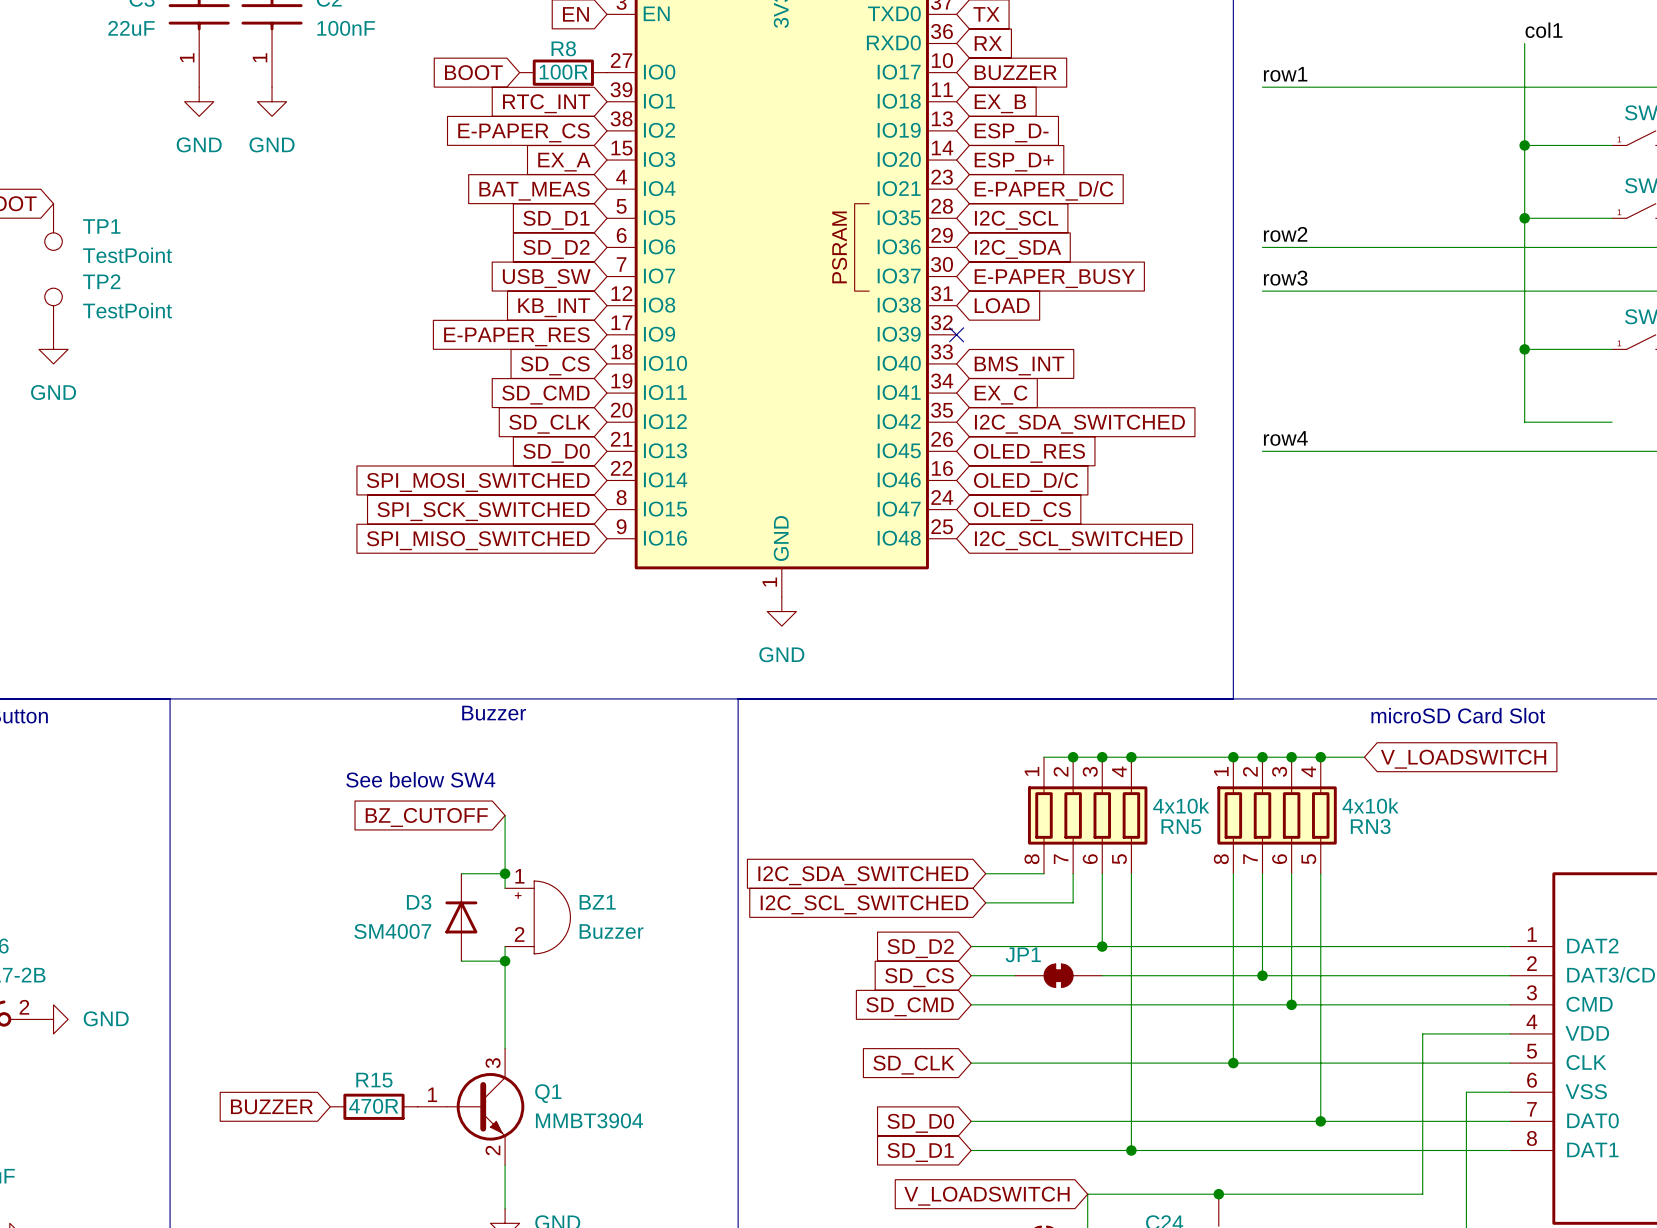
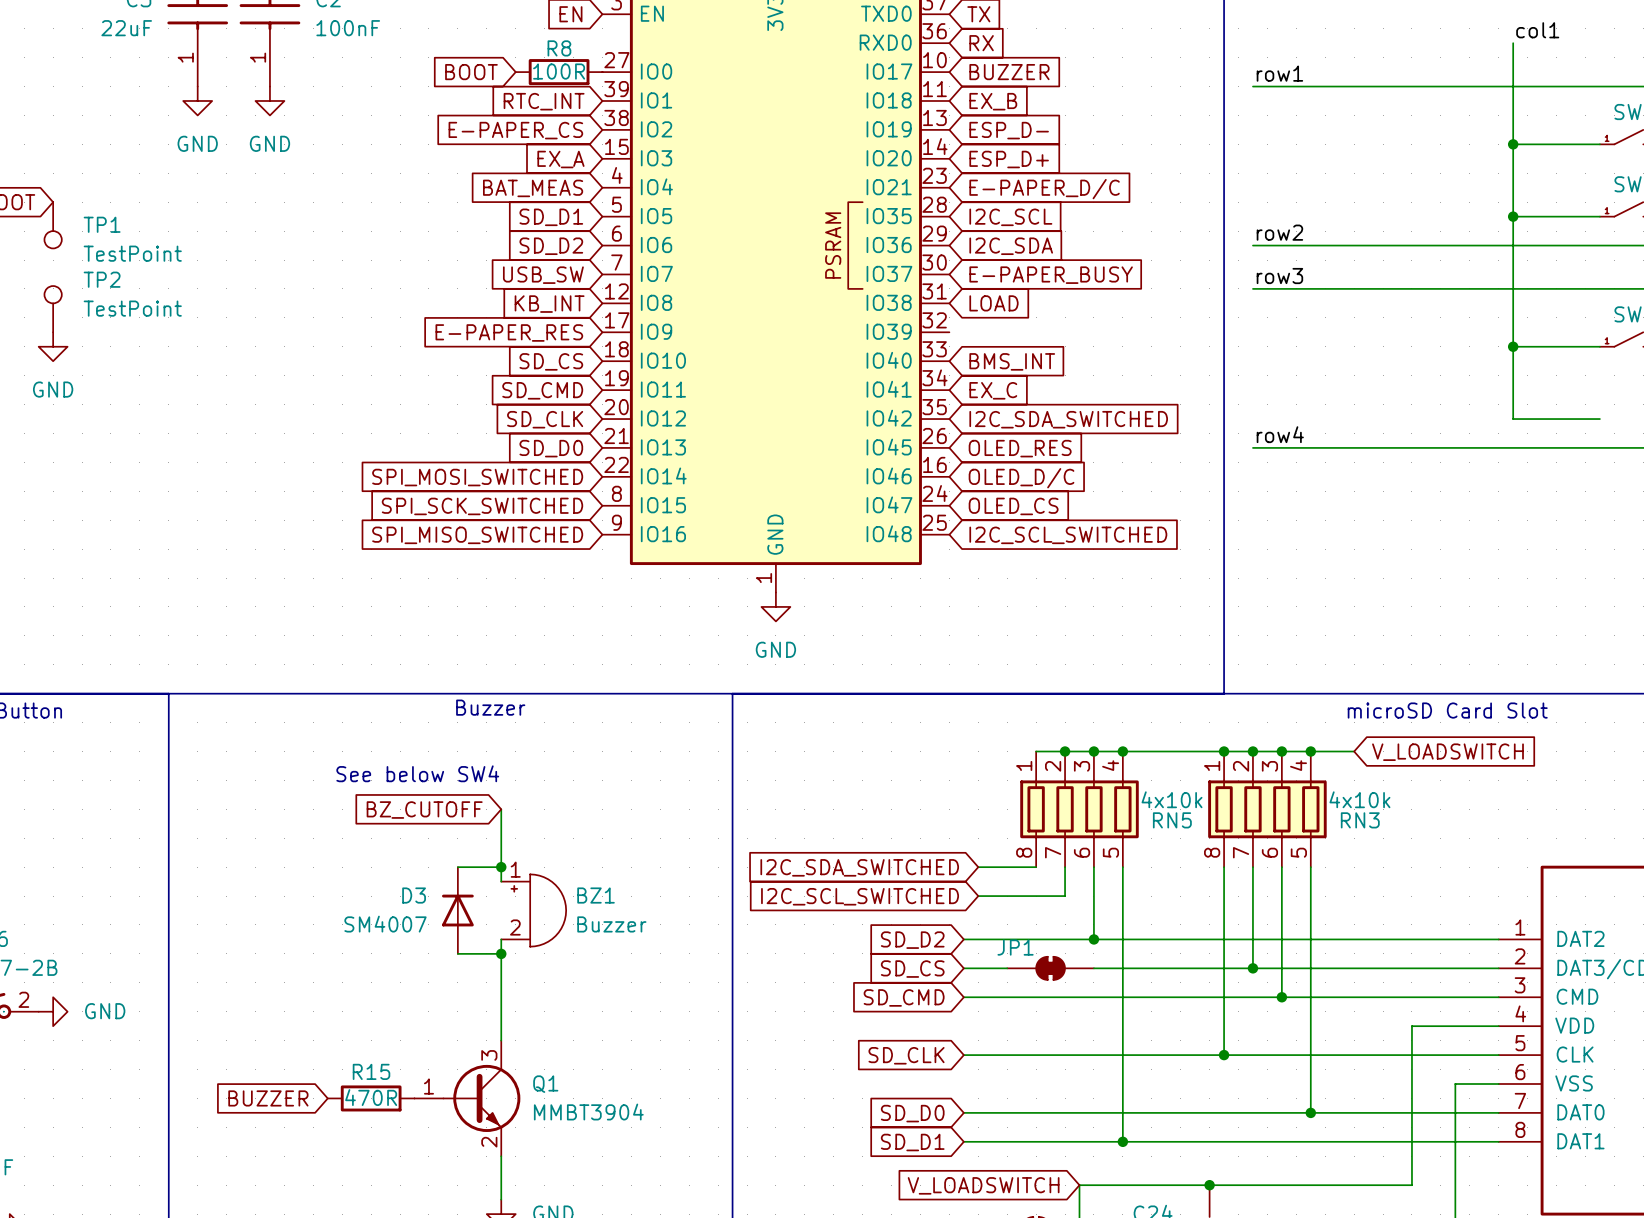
no-connect mark: (956, 334) -> none

